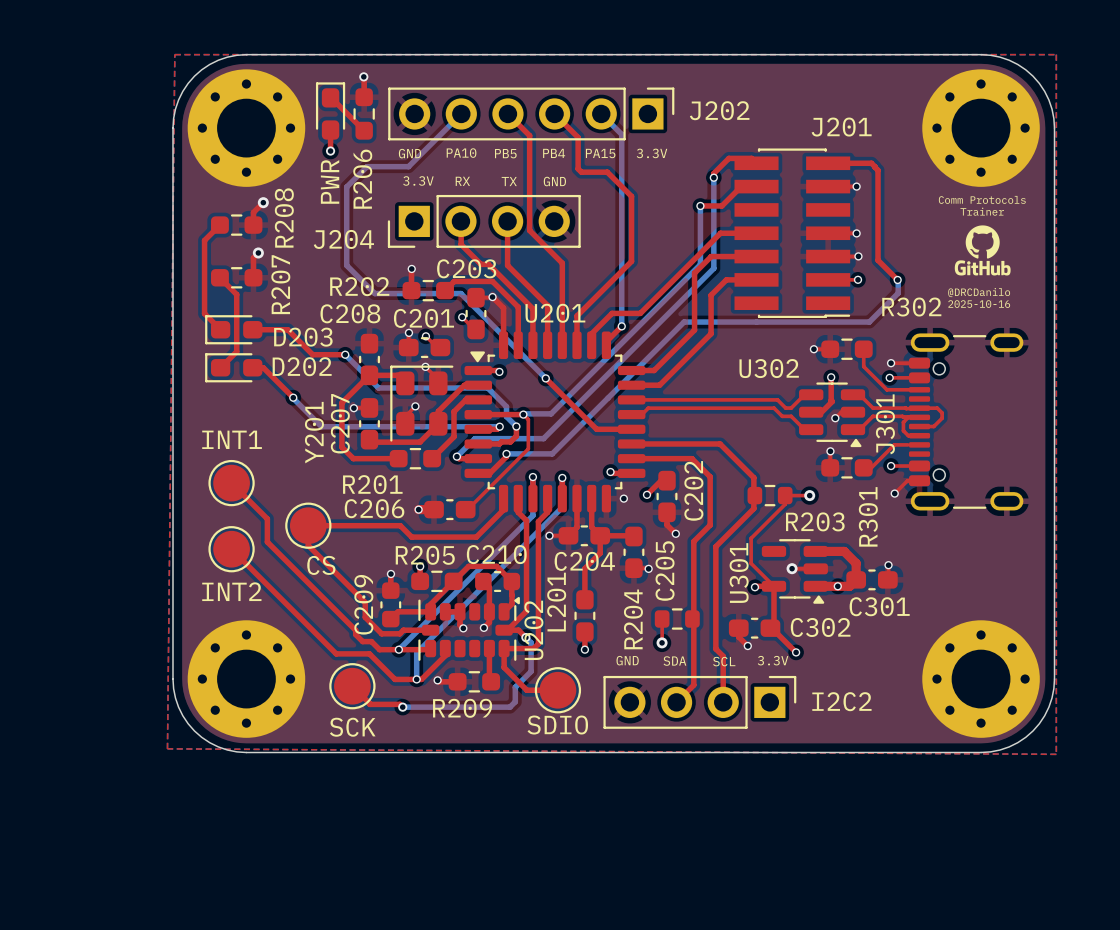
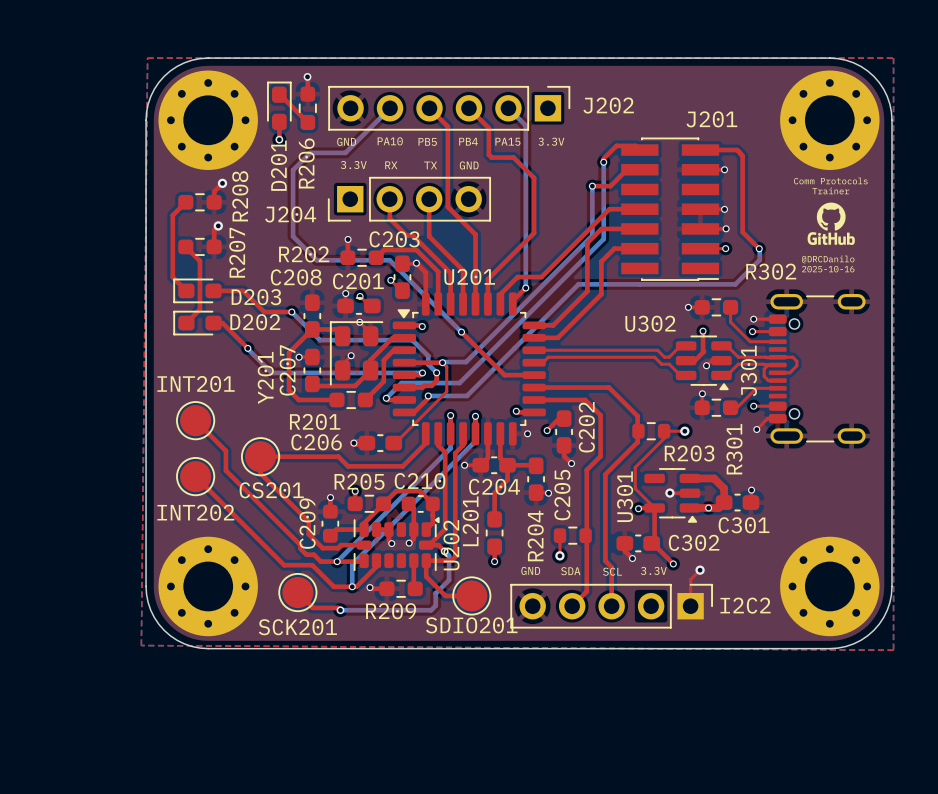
PWR name: PWR (330, 181) -> D201 (278, 165)
INT1 name: INT1 (232, 439) -> INT201 (196, 384)
CS name: CS (321, 565) -> CS201 (271, 490)
INT2 name: INT2 (231, 591) -> INT202 (195, 512)
top track: none -> (700, 570) (690, 579) (690, 606)
via: none -> (700, 570)
I2C2 footprint: [603, 675, 797, 729] -> [510, 583, 713, 629]
SDIO name: SDIO (557, 725) -> SDIO201 (471, 625)
SCK name: SCK (352, 727) -> SCK201 (297, 627)

